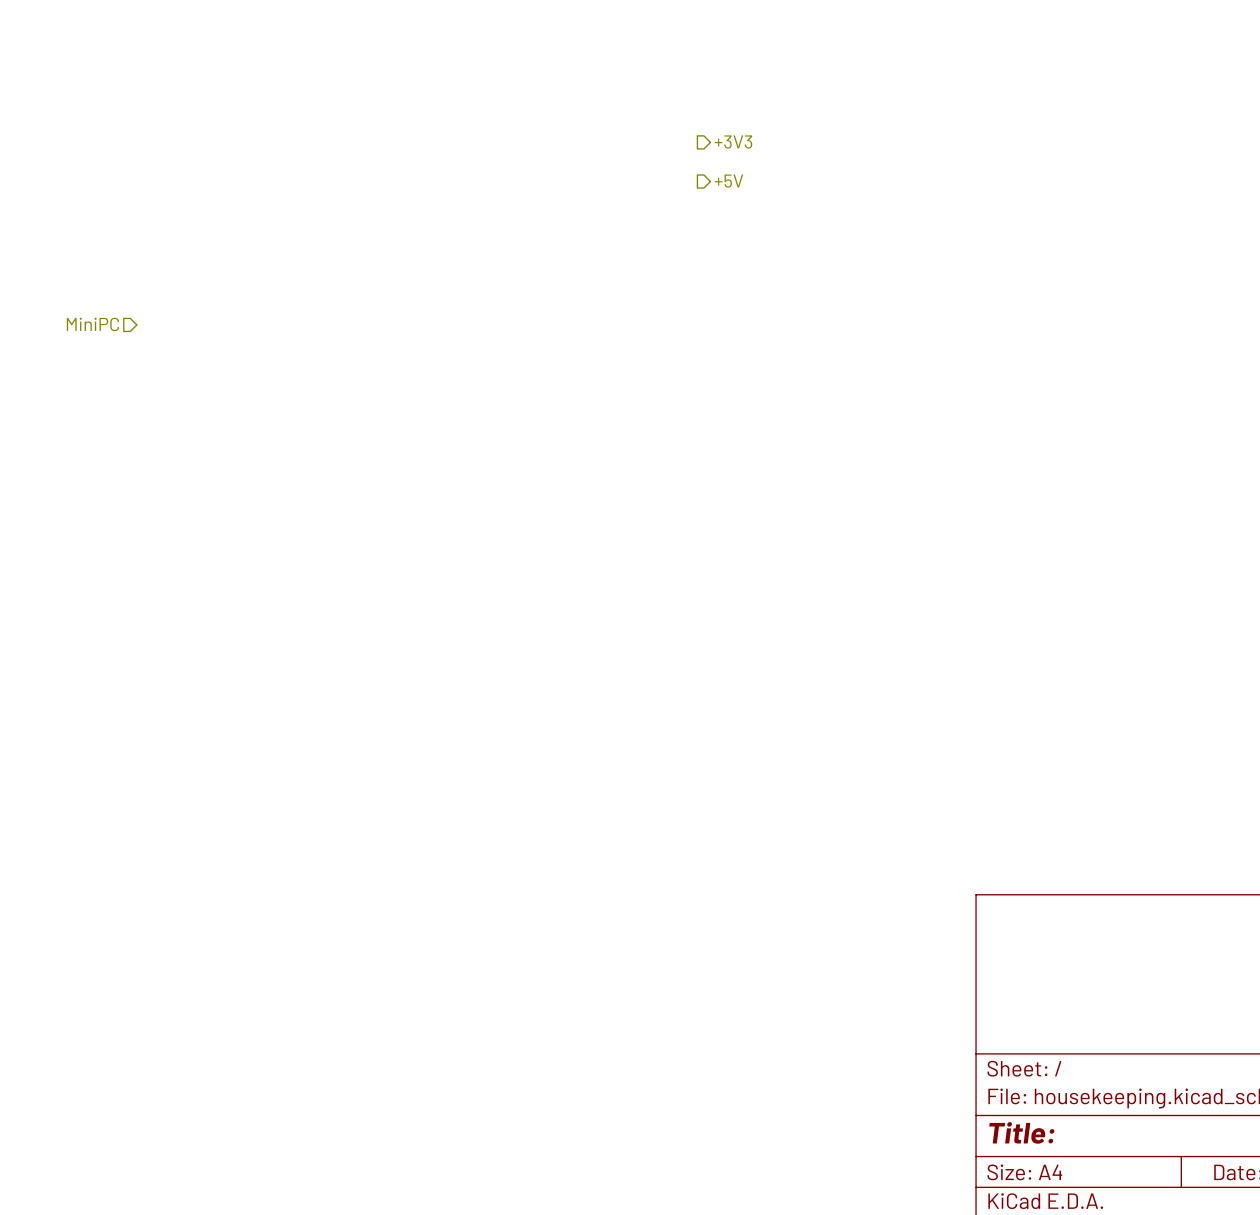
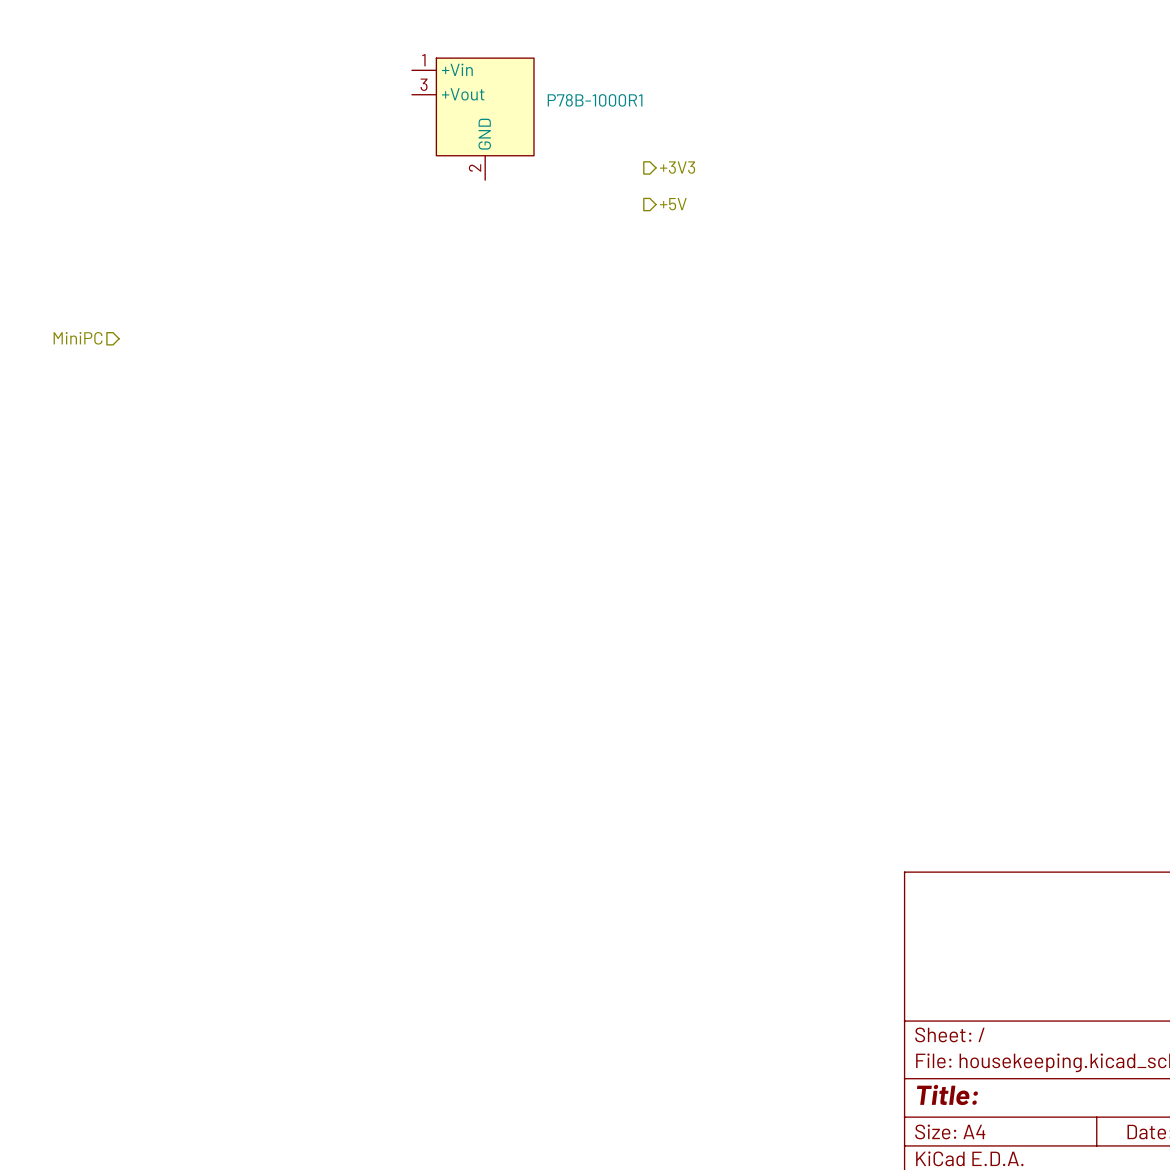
P78B-1000R1: none -> (472, 119)

